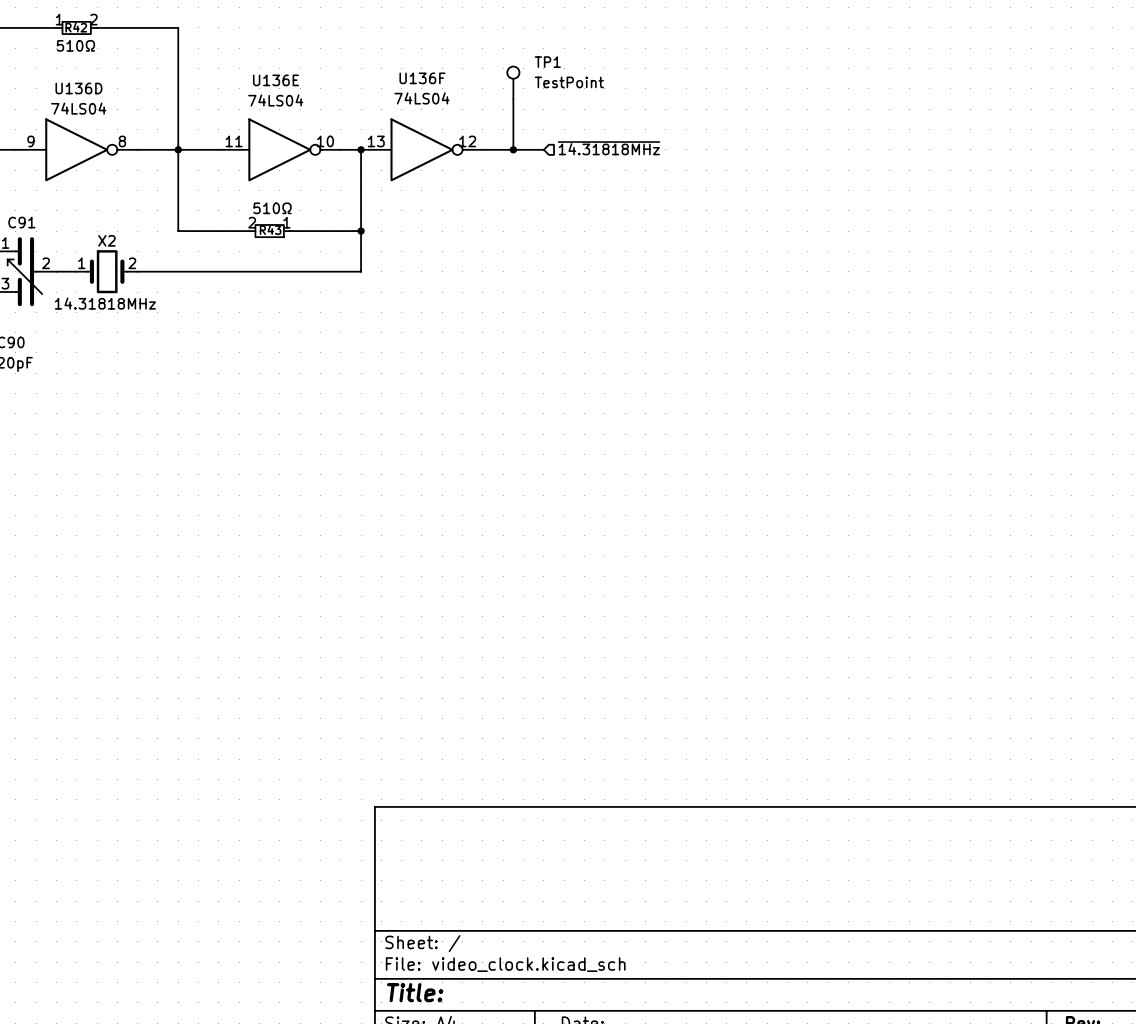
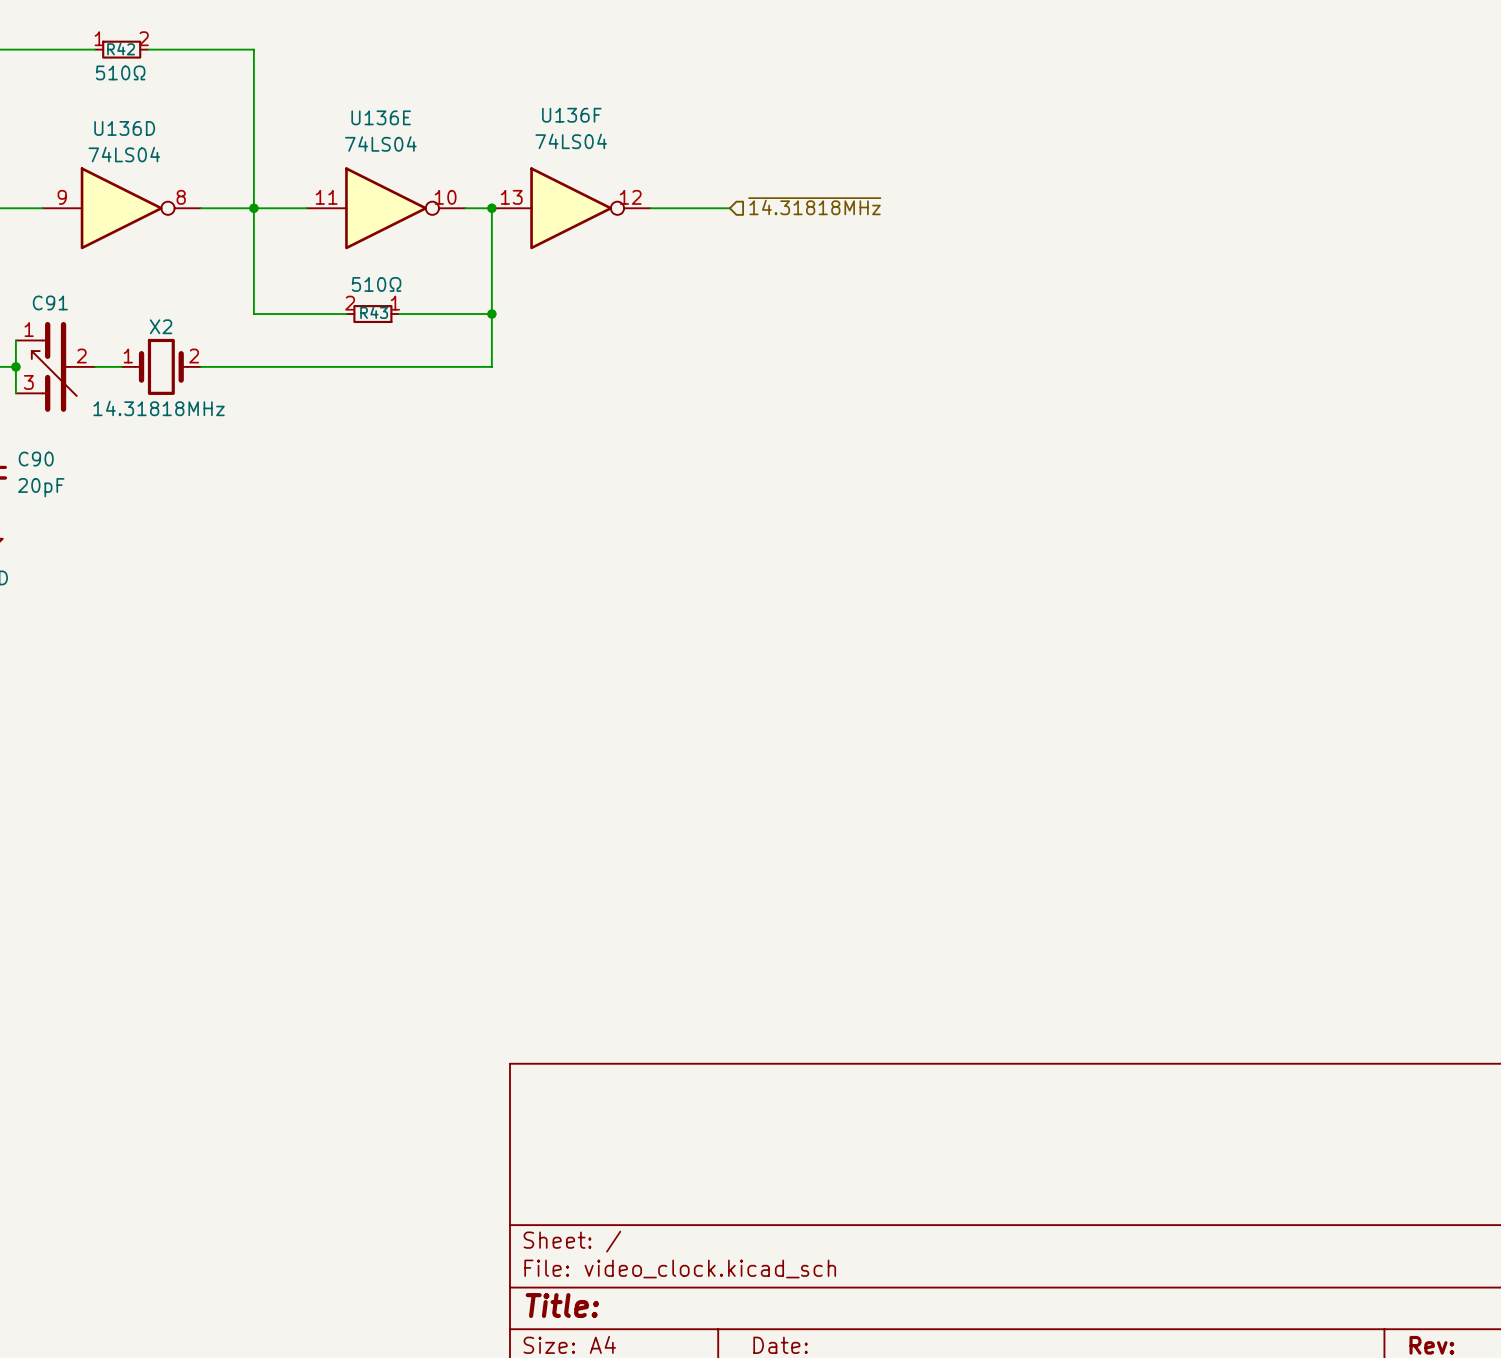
TP1: TestPoint (513, 82) -> none
wire: (513, 99) (513, 149) -> none
junction: (513, 149) -> none

